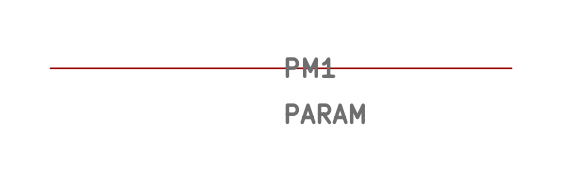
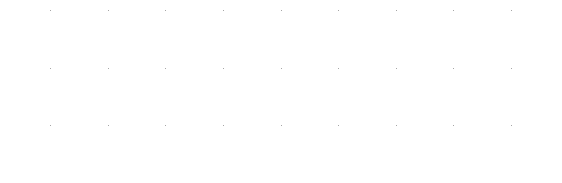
PM1: PARAM (281, 68) -> none

